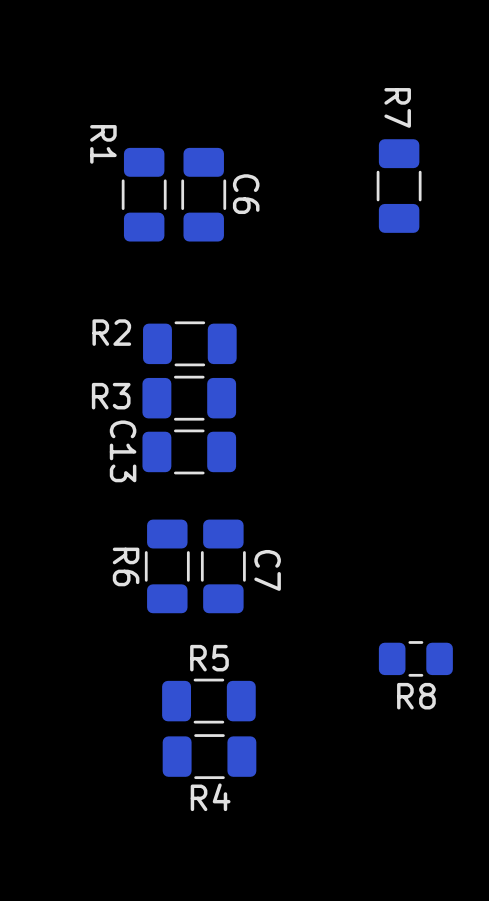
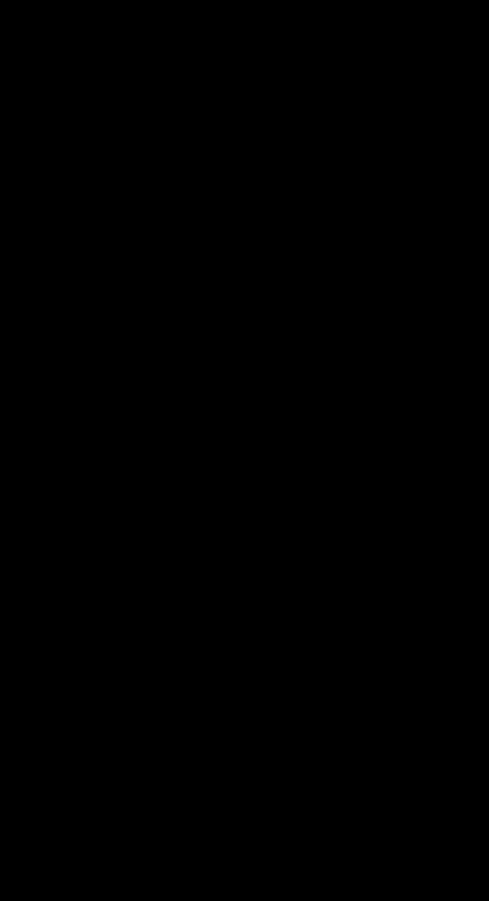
R7: (399, 186) -> none
R1: (144, 194) -> none
C6: (203, 194) -> none
R2: (189, 343) -> none
R3: (189, 398) -> none
C13: (189, 451) -> none
R6: (167, 566) -> none
C7: (223, 566) -> none
R8: (415, 658) -> none
R5: (208, 701) -> none
R4: (209, 756) -> none

